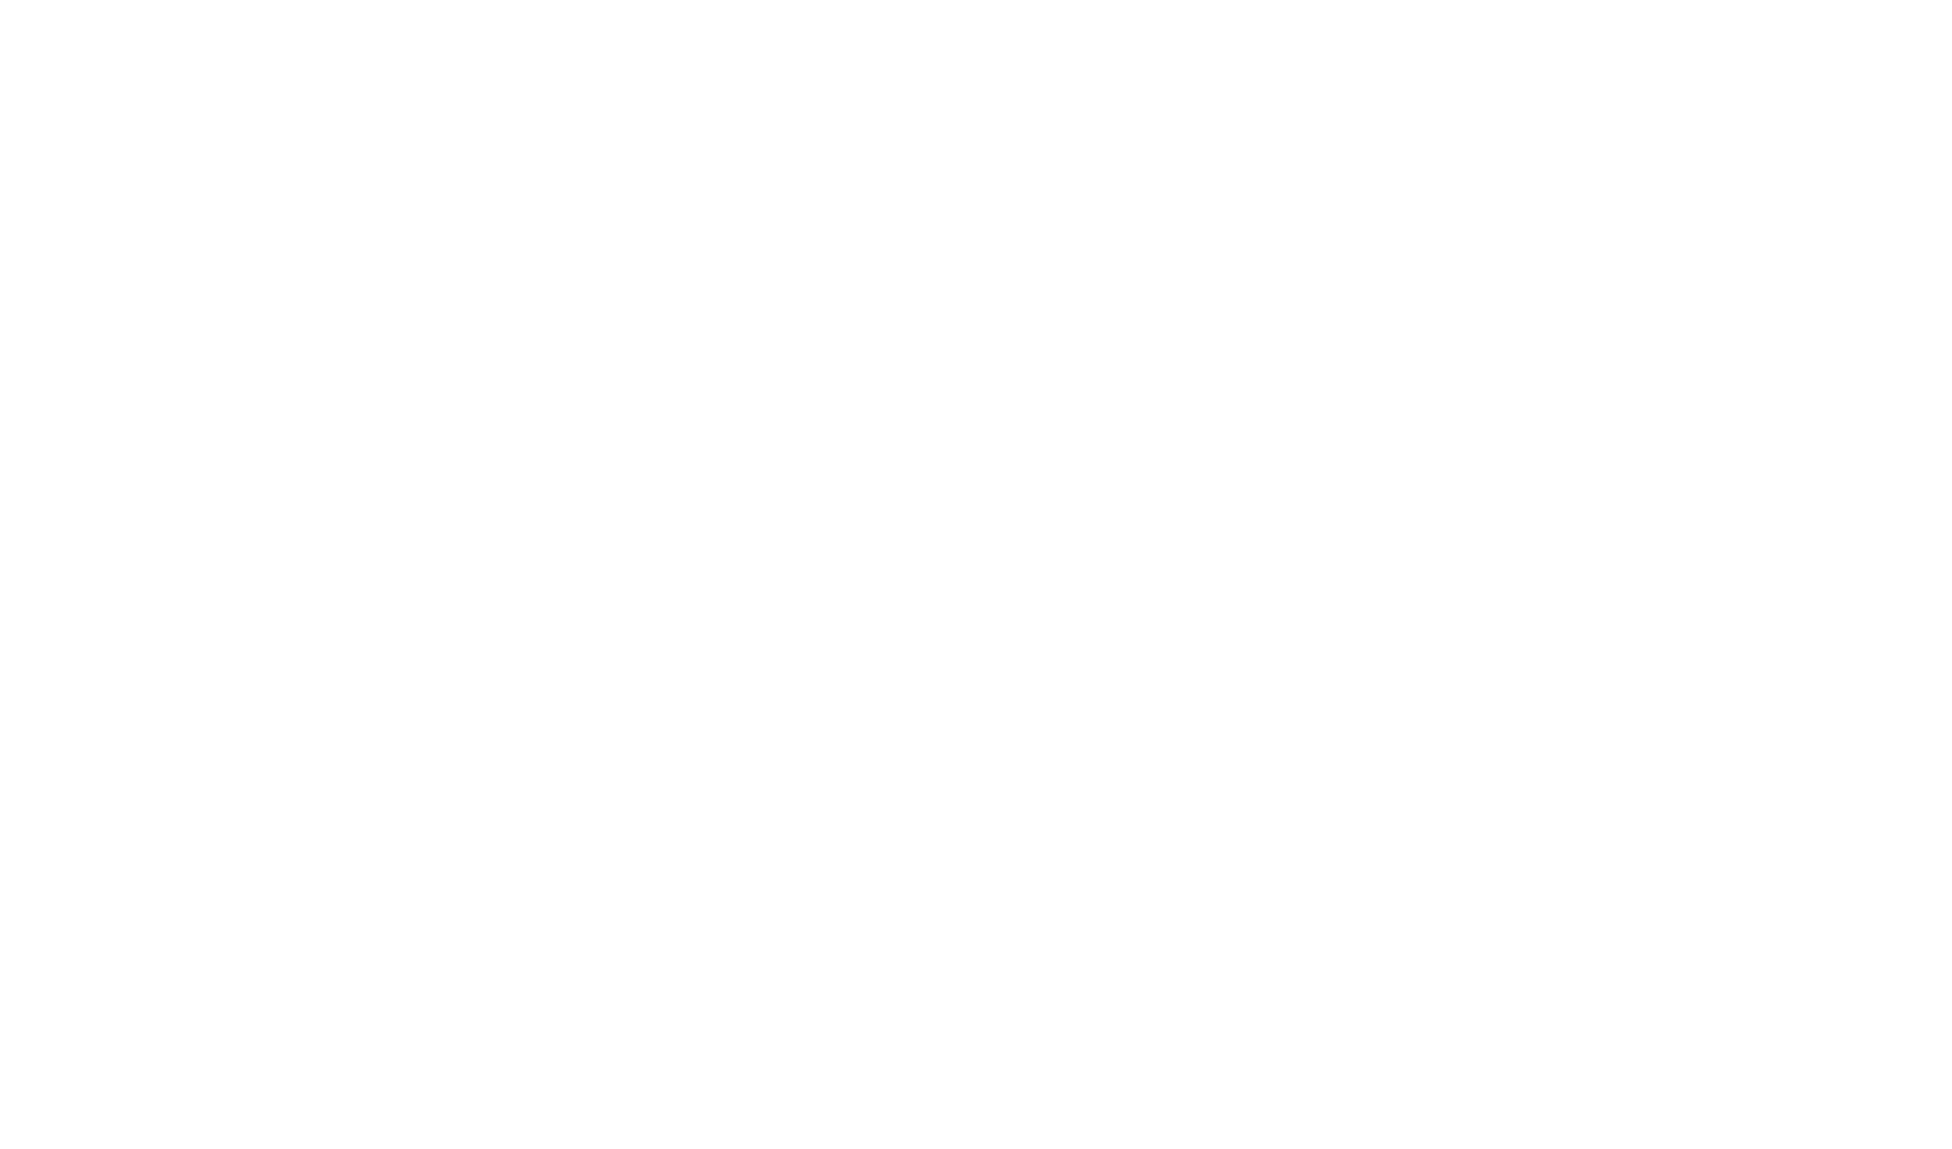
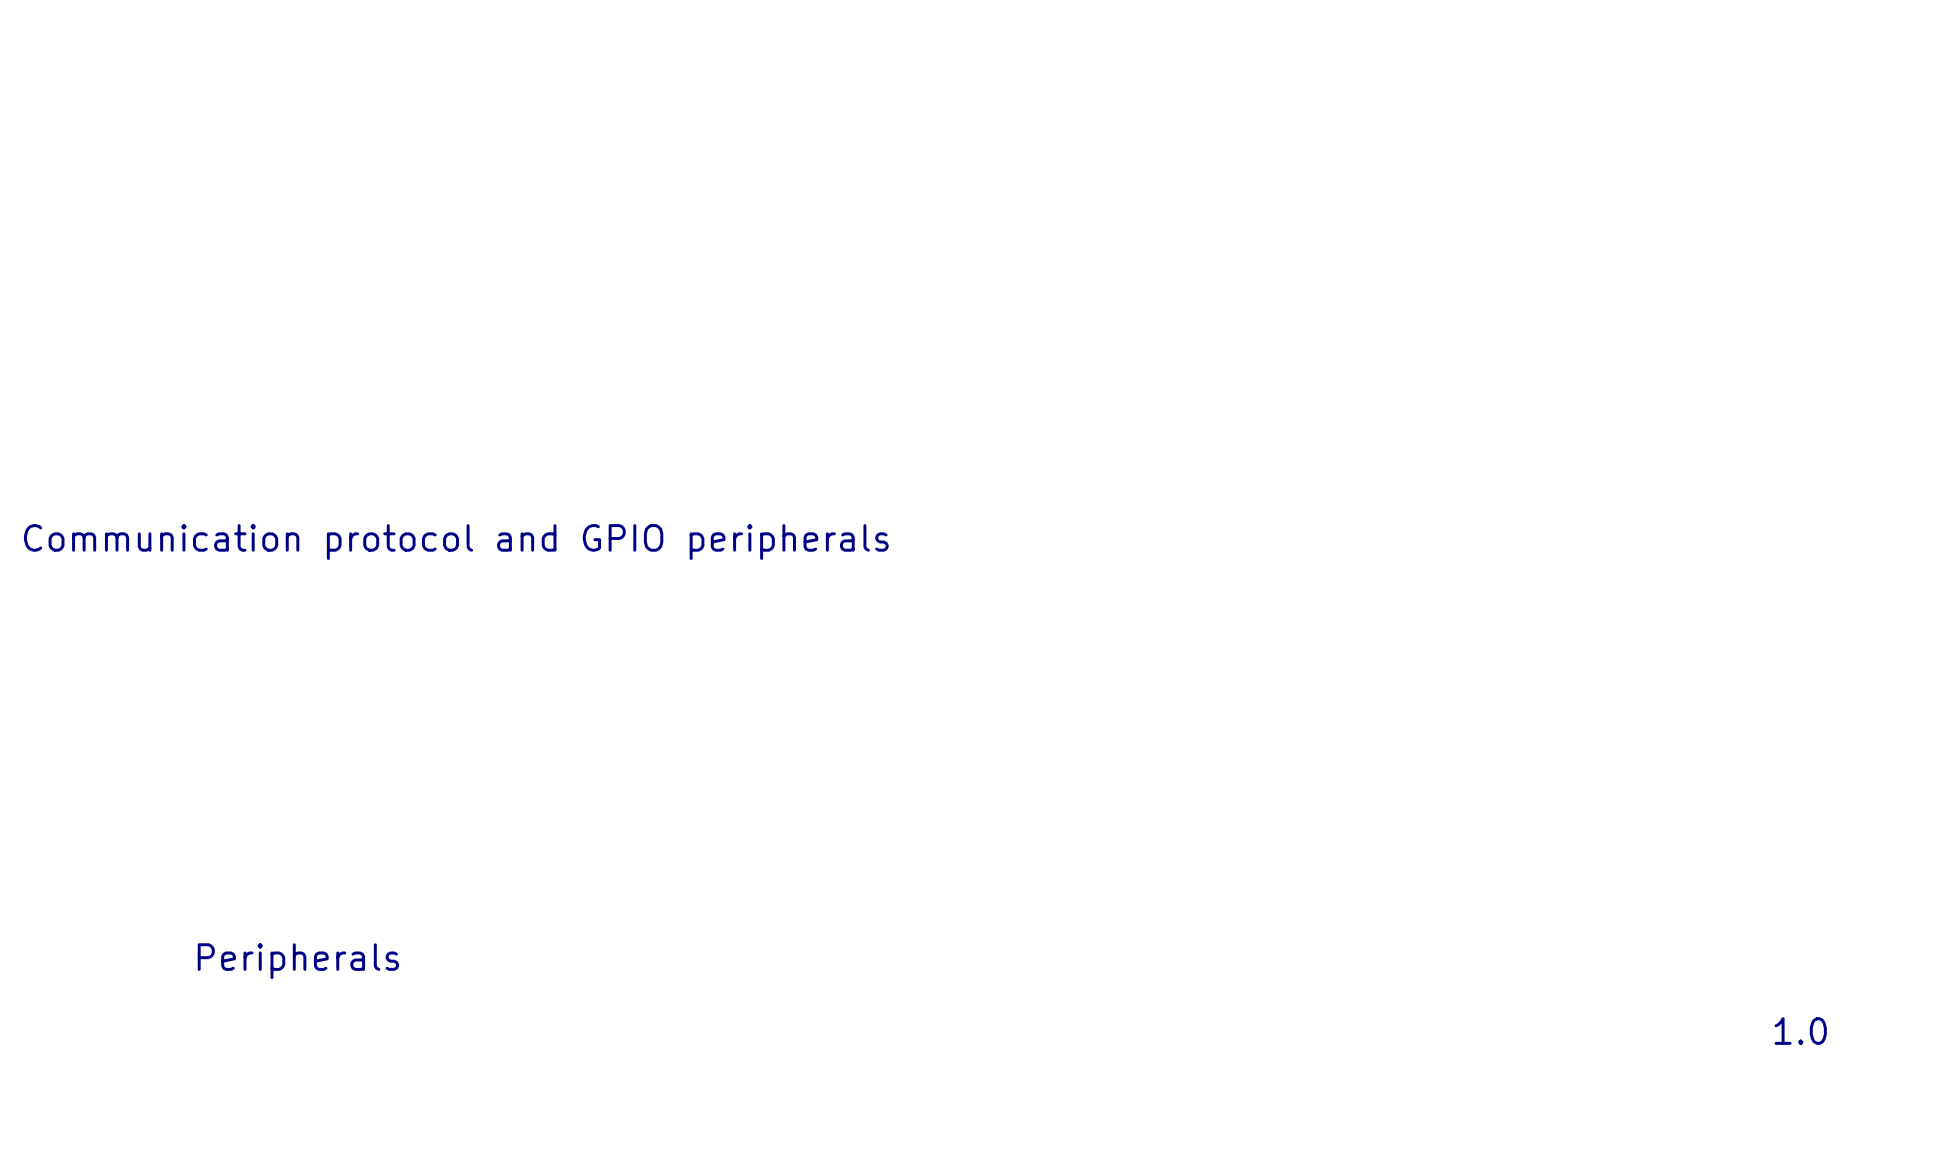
text: none -> Communication protocol and GPIO peripherals (456, 542)
text: none -> Peripherals (298, 961)
text: none -> 1.0 (1800, 1031)

